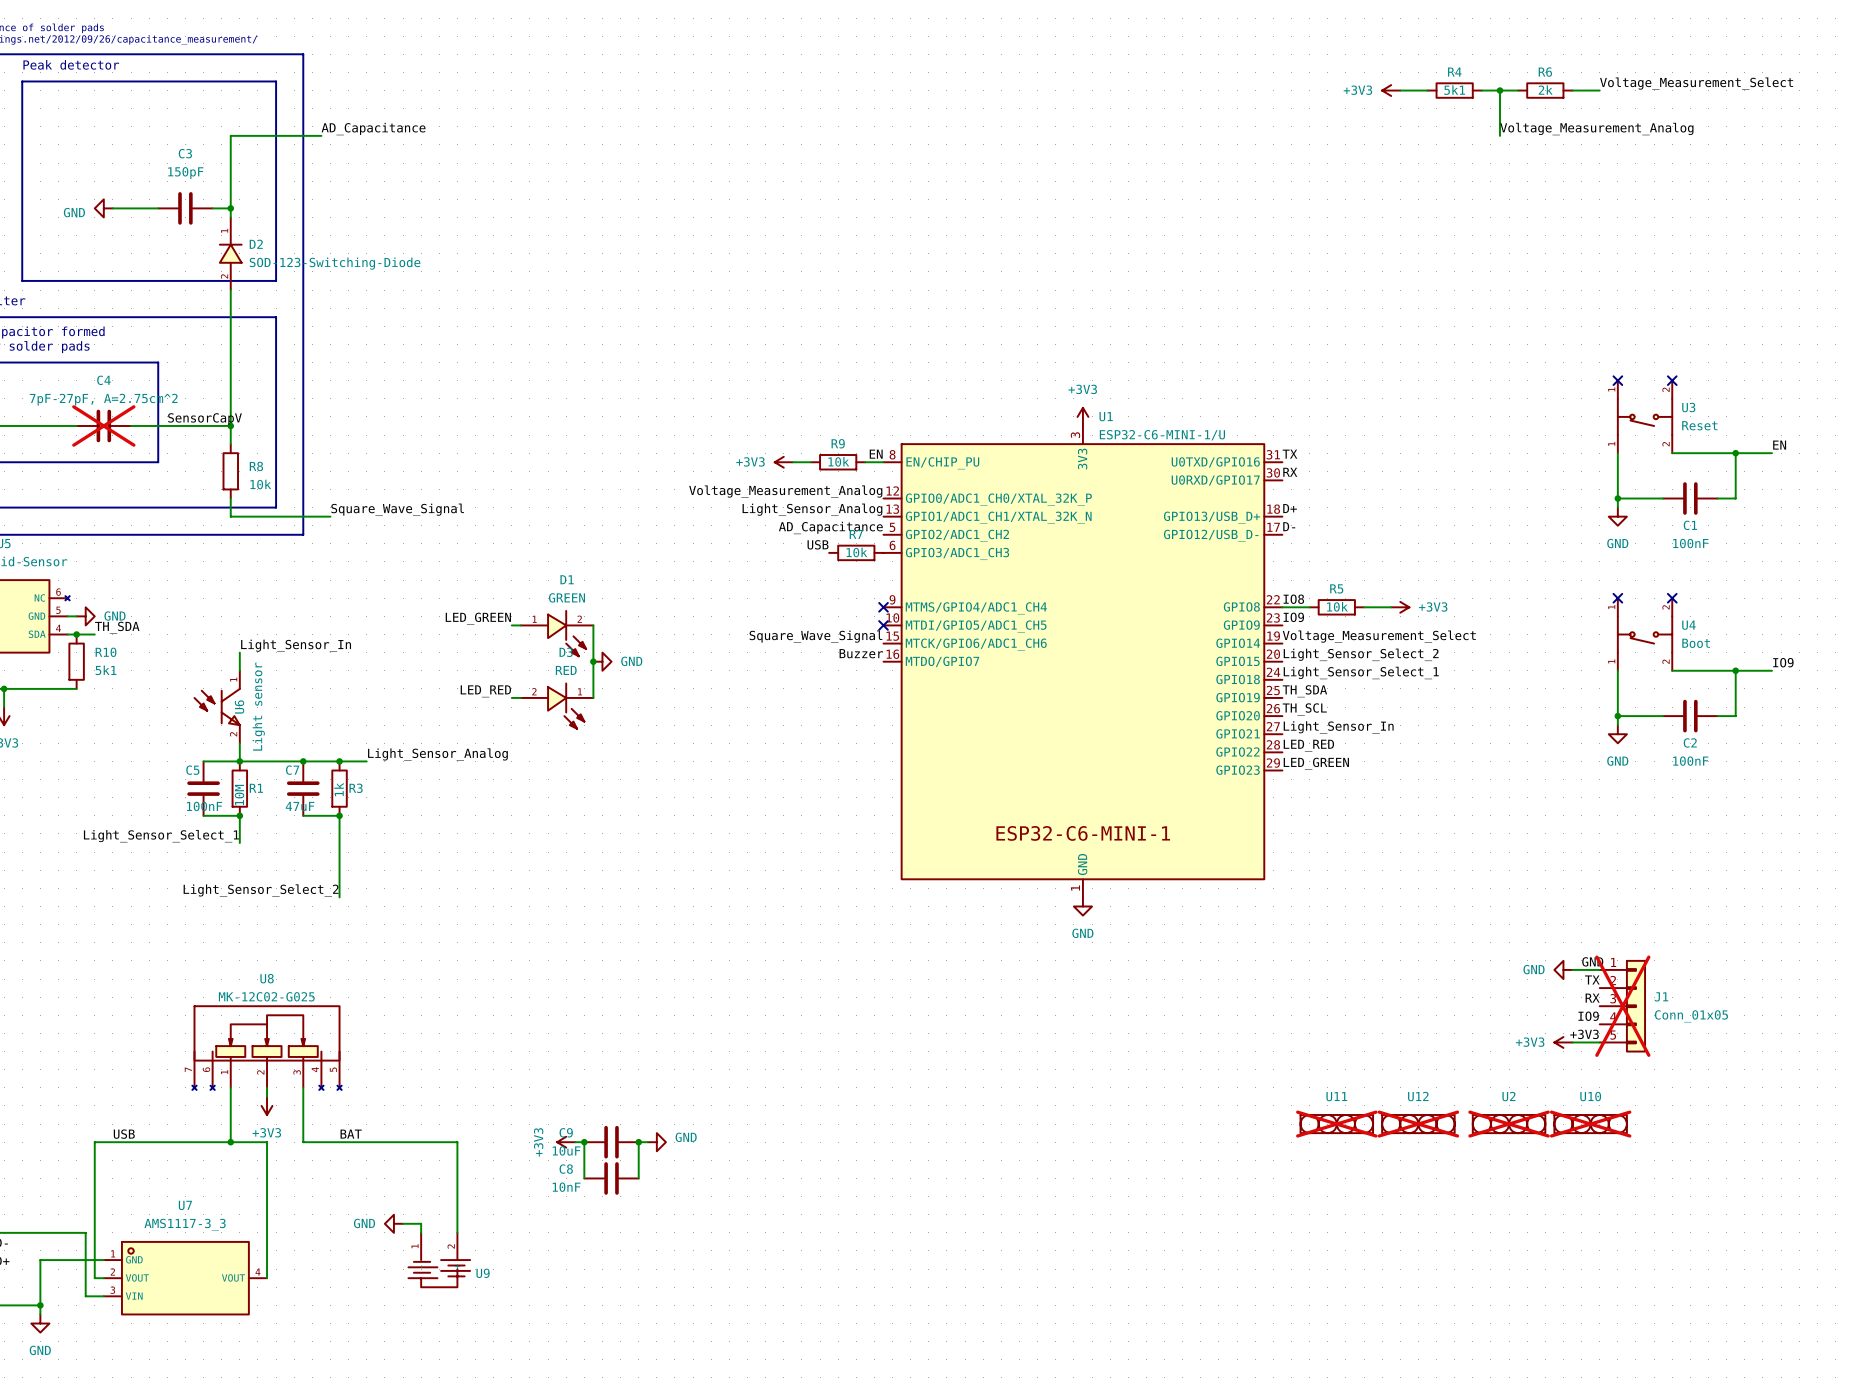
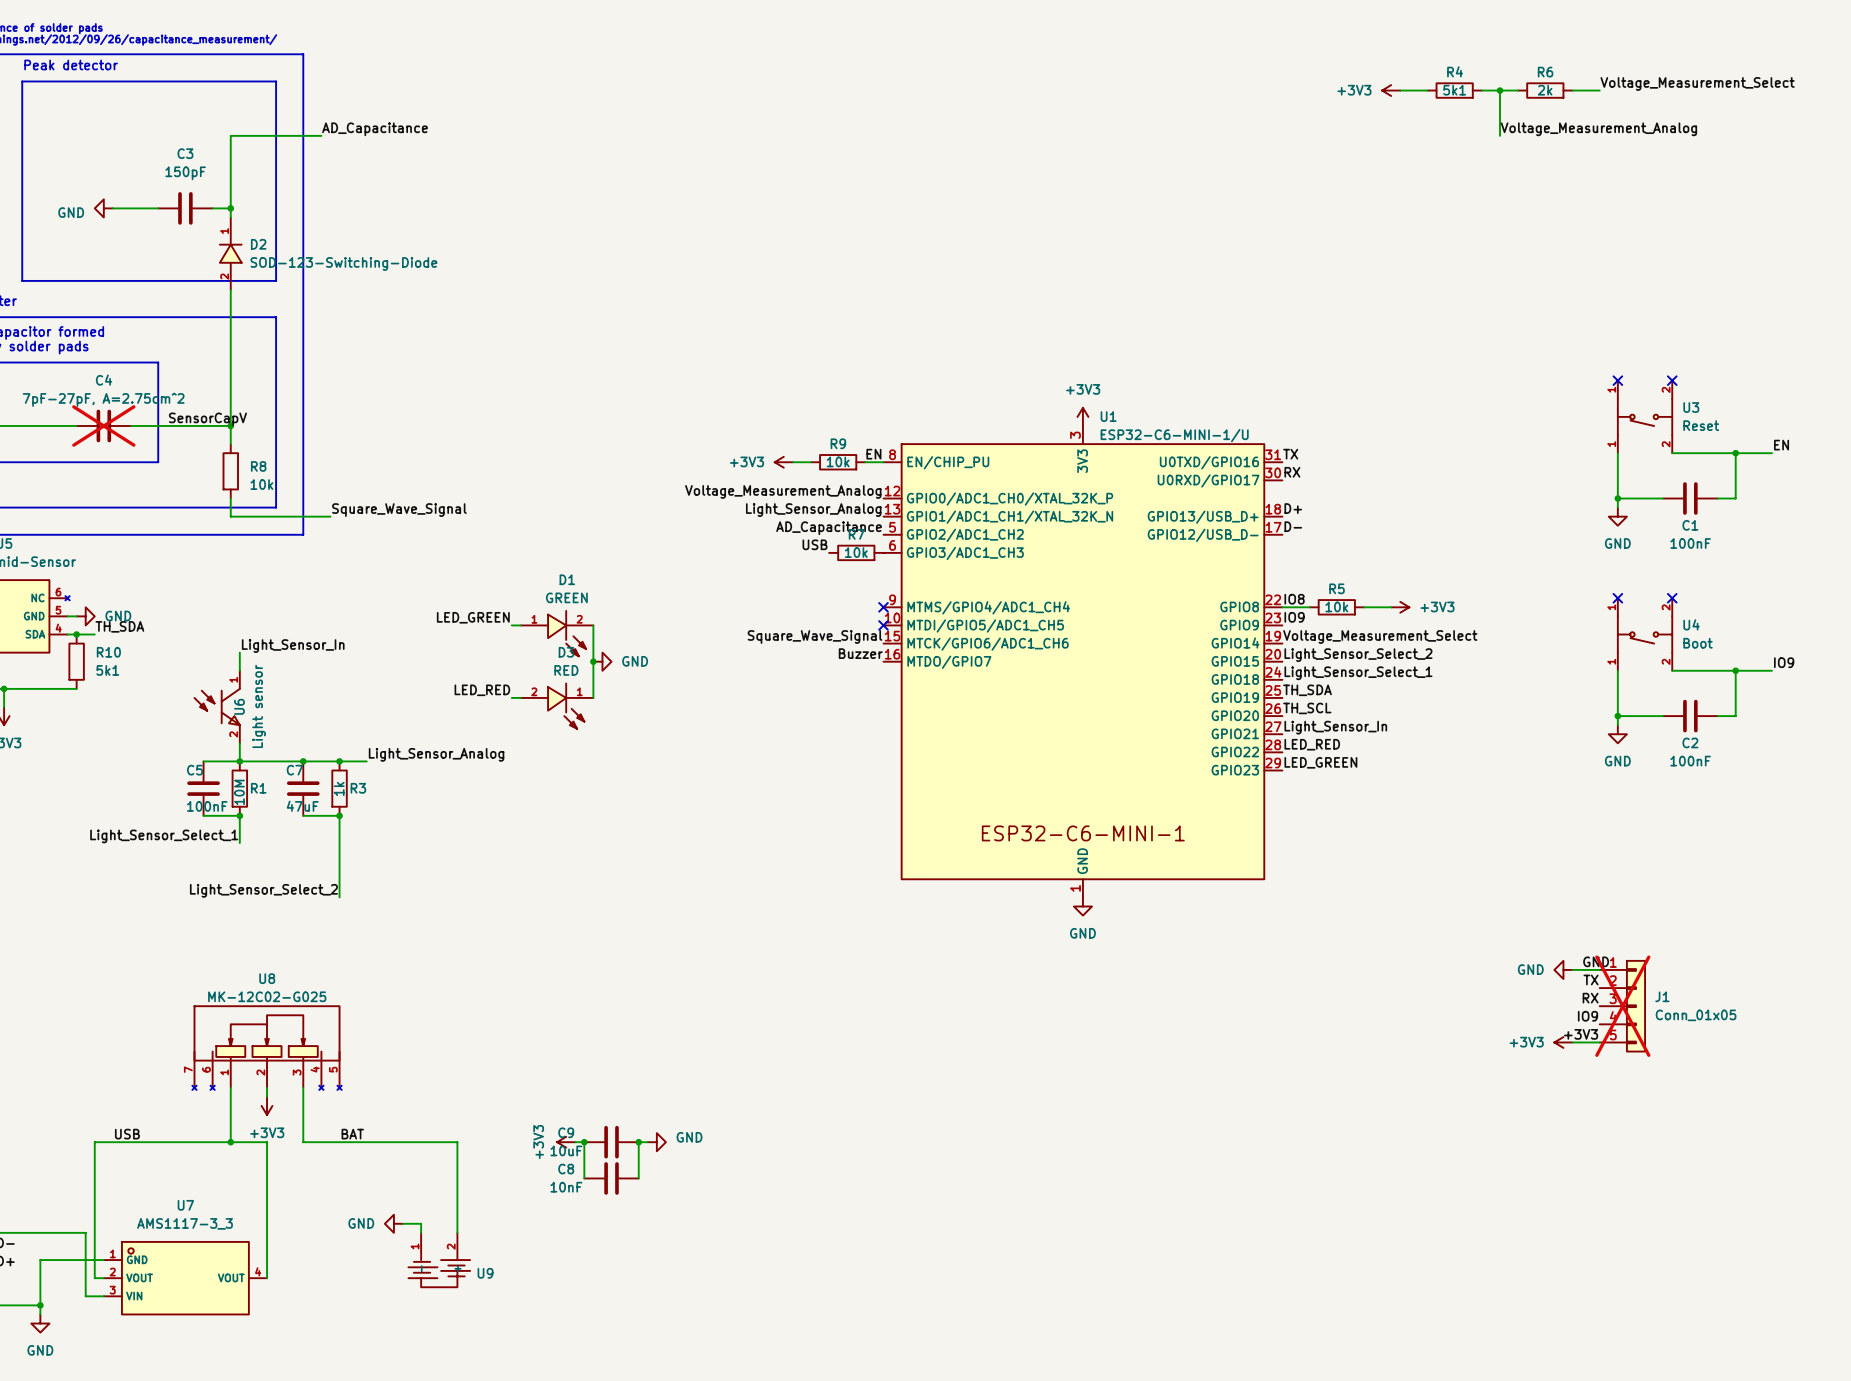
U11: (1336, 1124) -> none
U12: (1418, 1124) -> none
U2: (1509, 1124) -> none
U10: (1590, 1124) -> none

